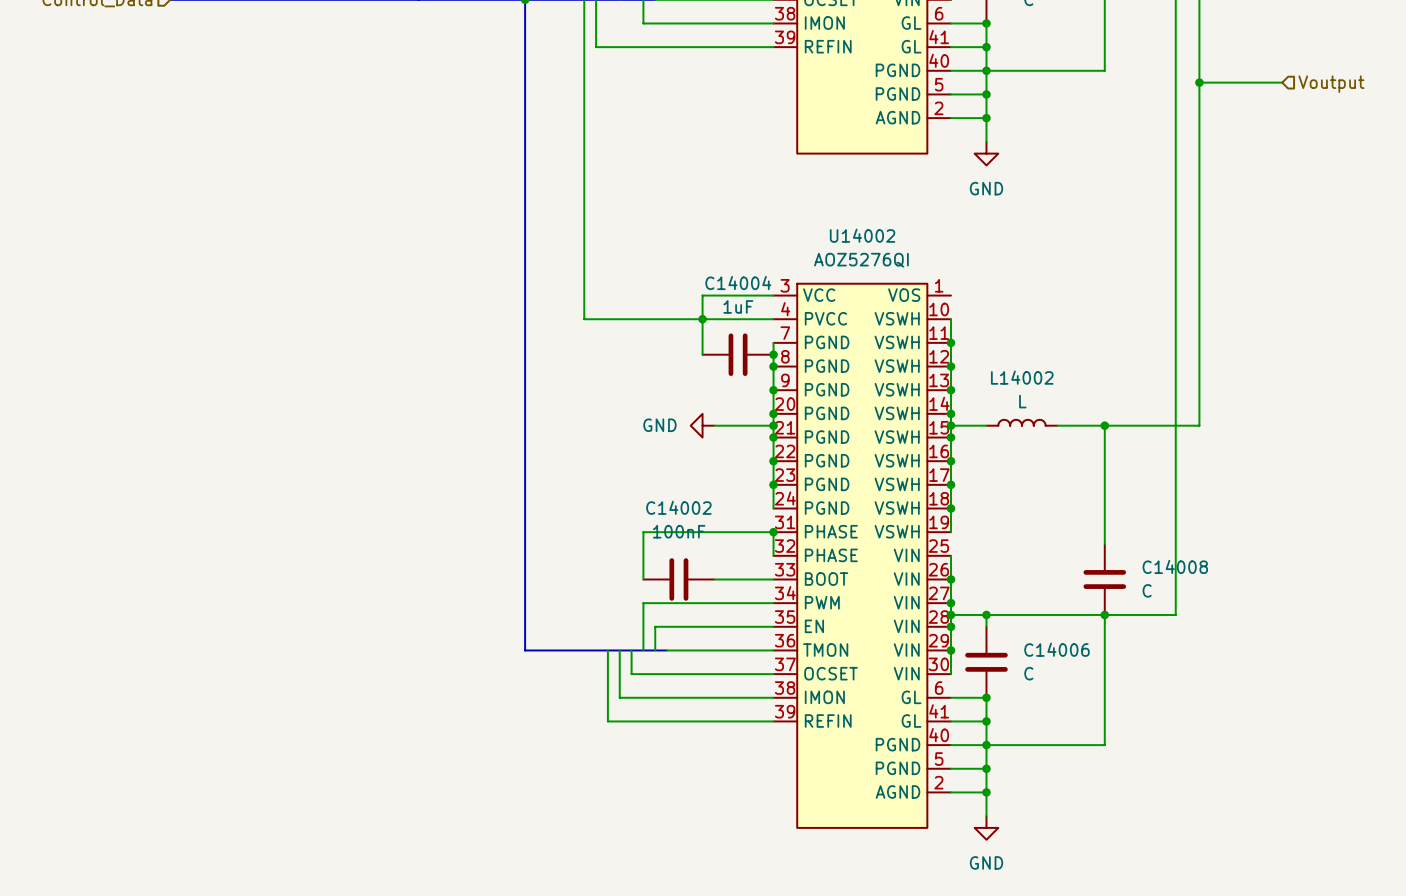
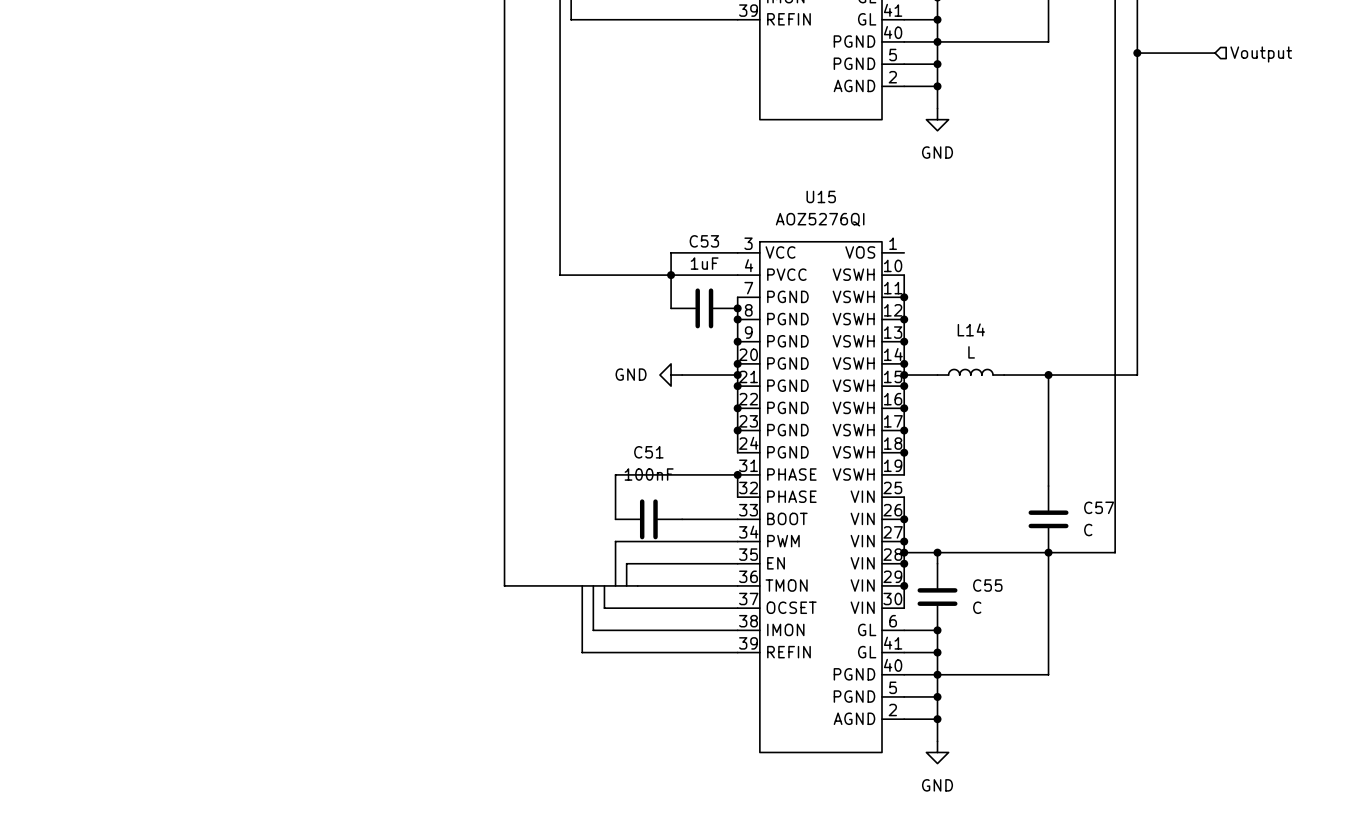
U14002 name: U14002 (862, 235) -> U15 (821, 196)
C14004 name: C14004 (738, 283) -> C53 (704, 241)
L14002 name: L14002 (1022, 377) -> L14 (971, 329)
C14002 name: C14002 (678, 507) -> C51 (648, 452)
C14008 name: C14008 (1175, 566) -> C57 (1099, 507)
C14006 name: C14006 (1056, 649) -> C55 (987, 585)

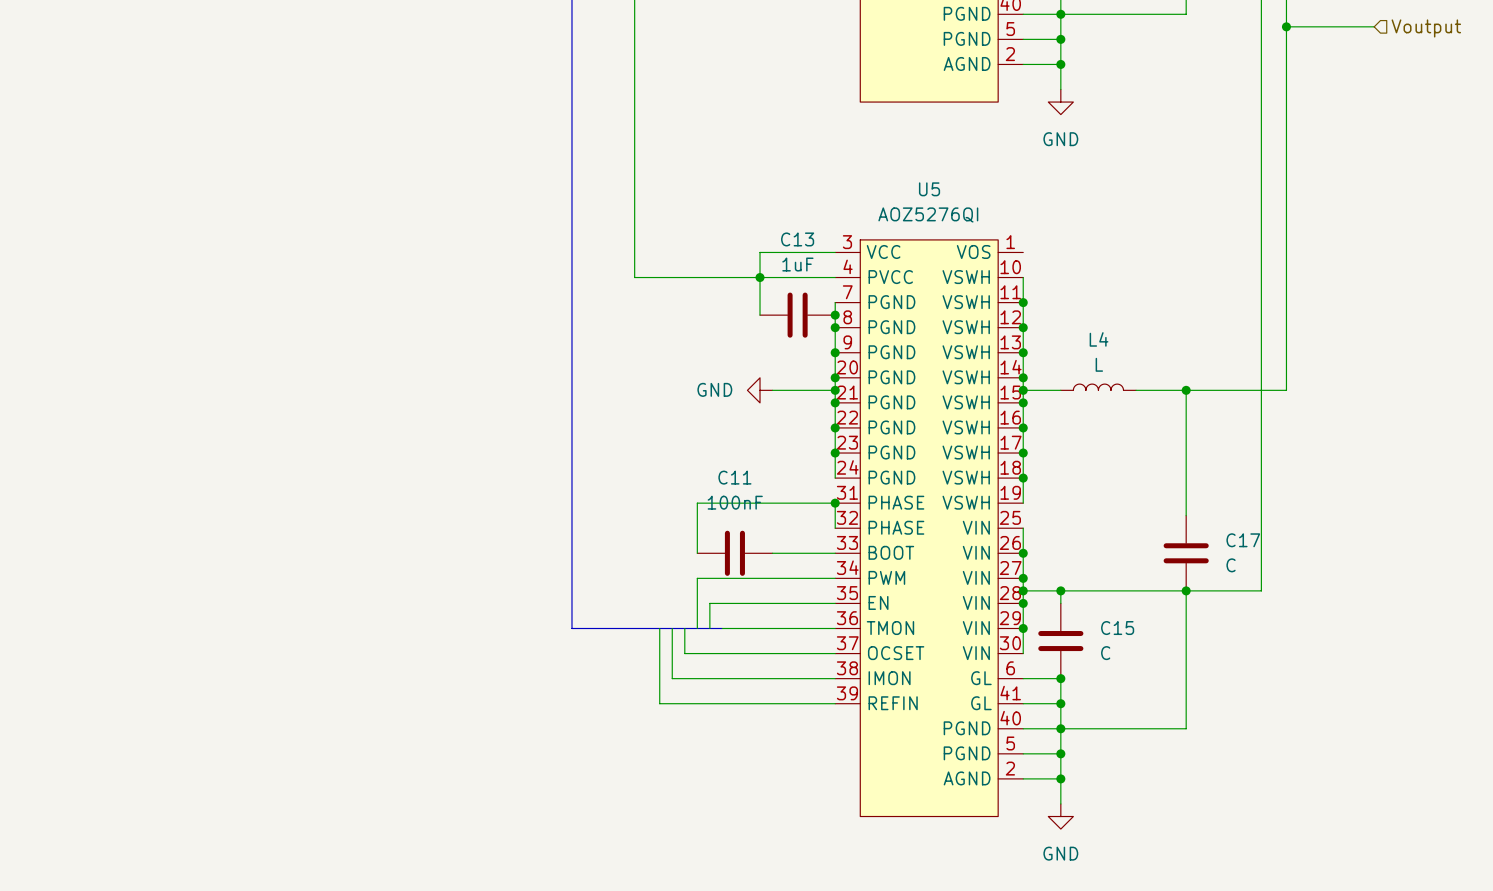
U15 name: U15 (821, 196) -> U5 (929, 189)
C53 name: C53 (704, 241) -> C13 (797, 239)
L14 name: L14 (971, 329) -> L4 (1099, 339)
C51 name: C51 (648, 452) -> C11 (734, 477)
C57 name: C57 (1099, 507) -> C17 (1243, 540)
C55 name: C55 (987, 585) -> C15 (1117, 628)

